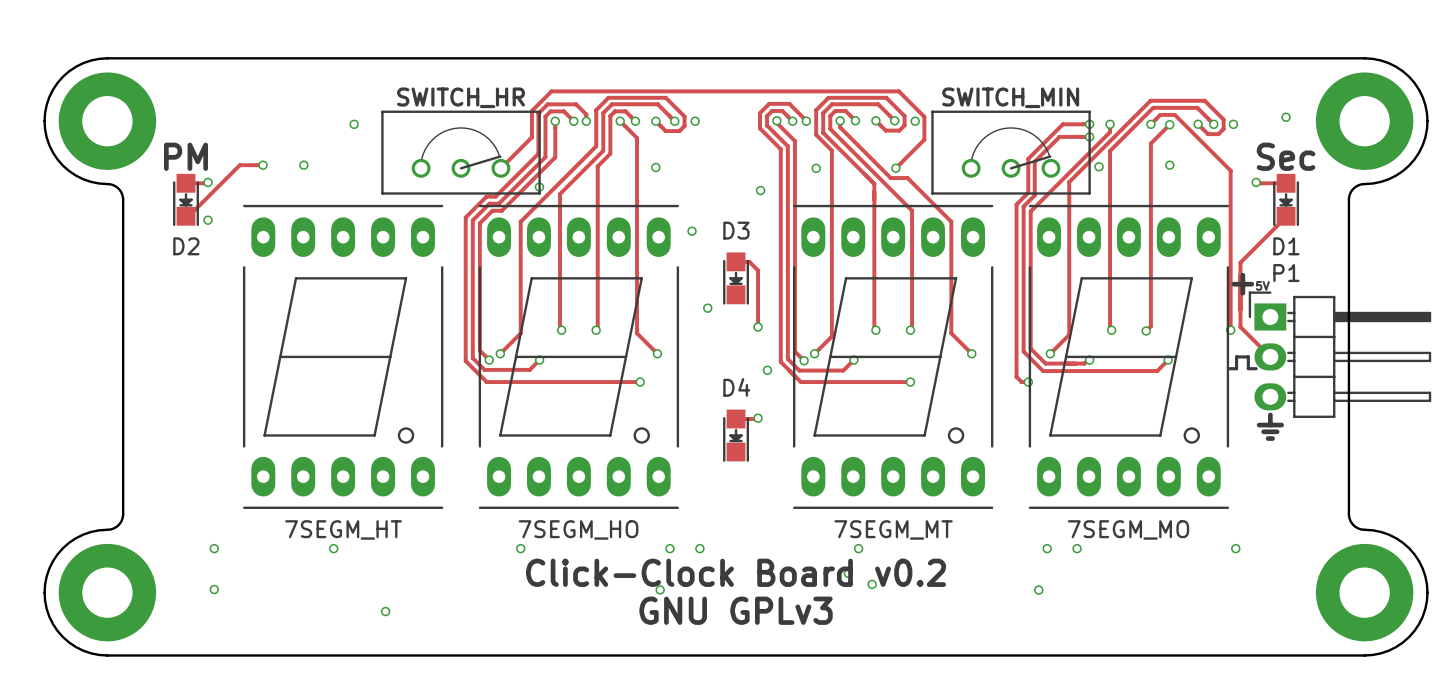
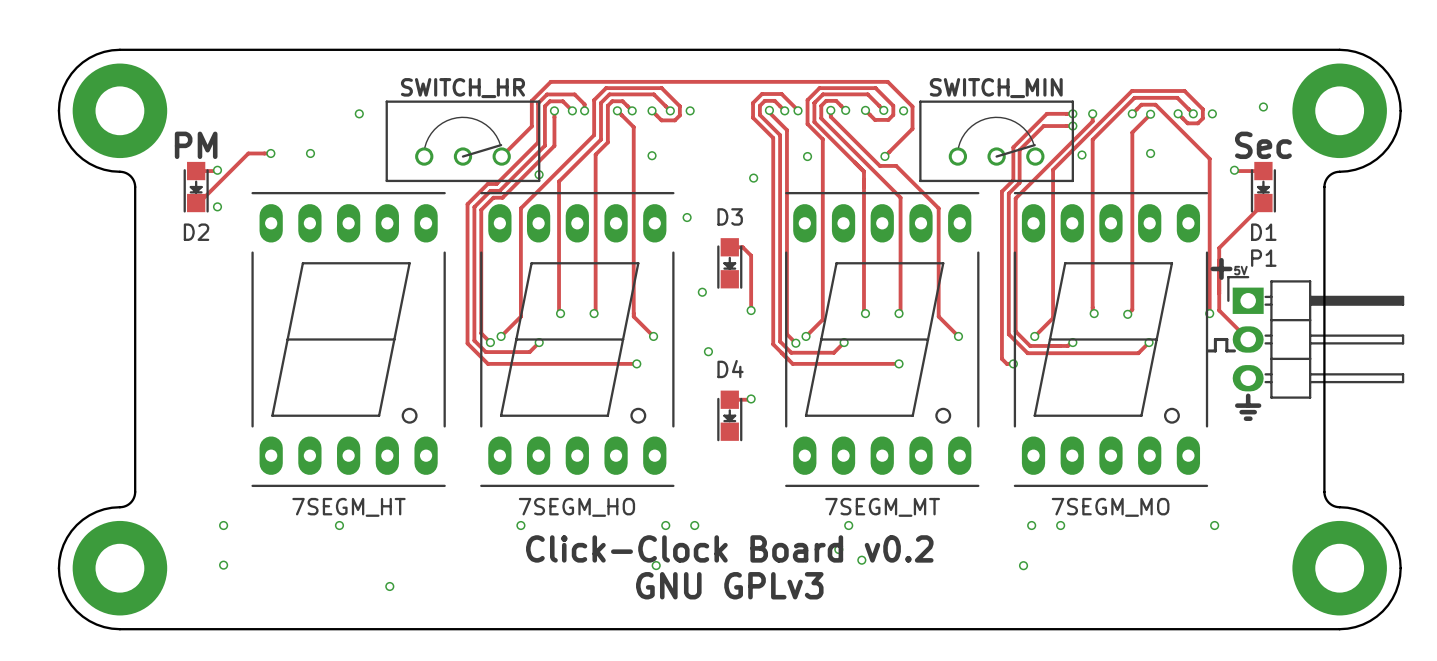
via position: (767, 370) -> (708, 351)

